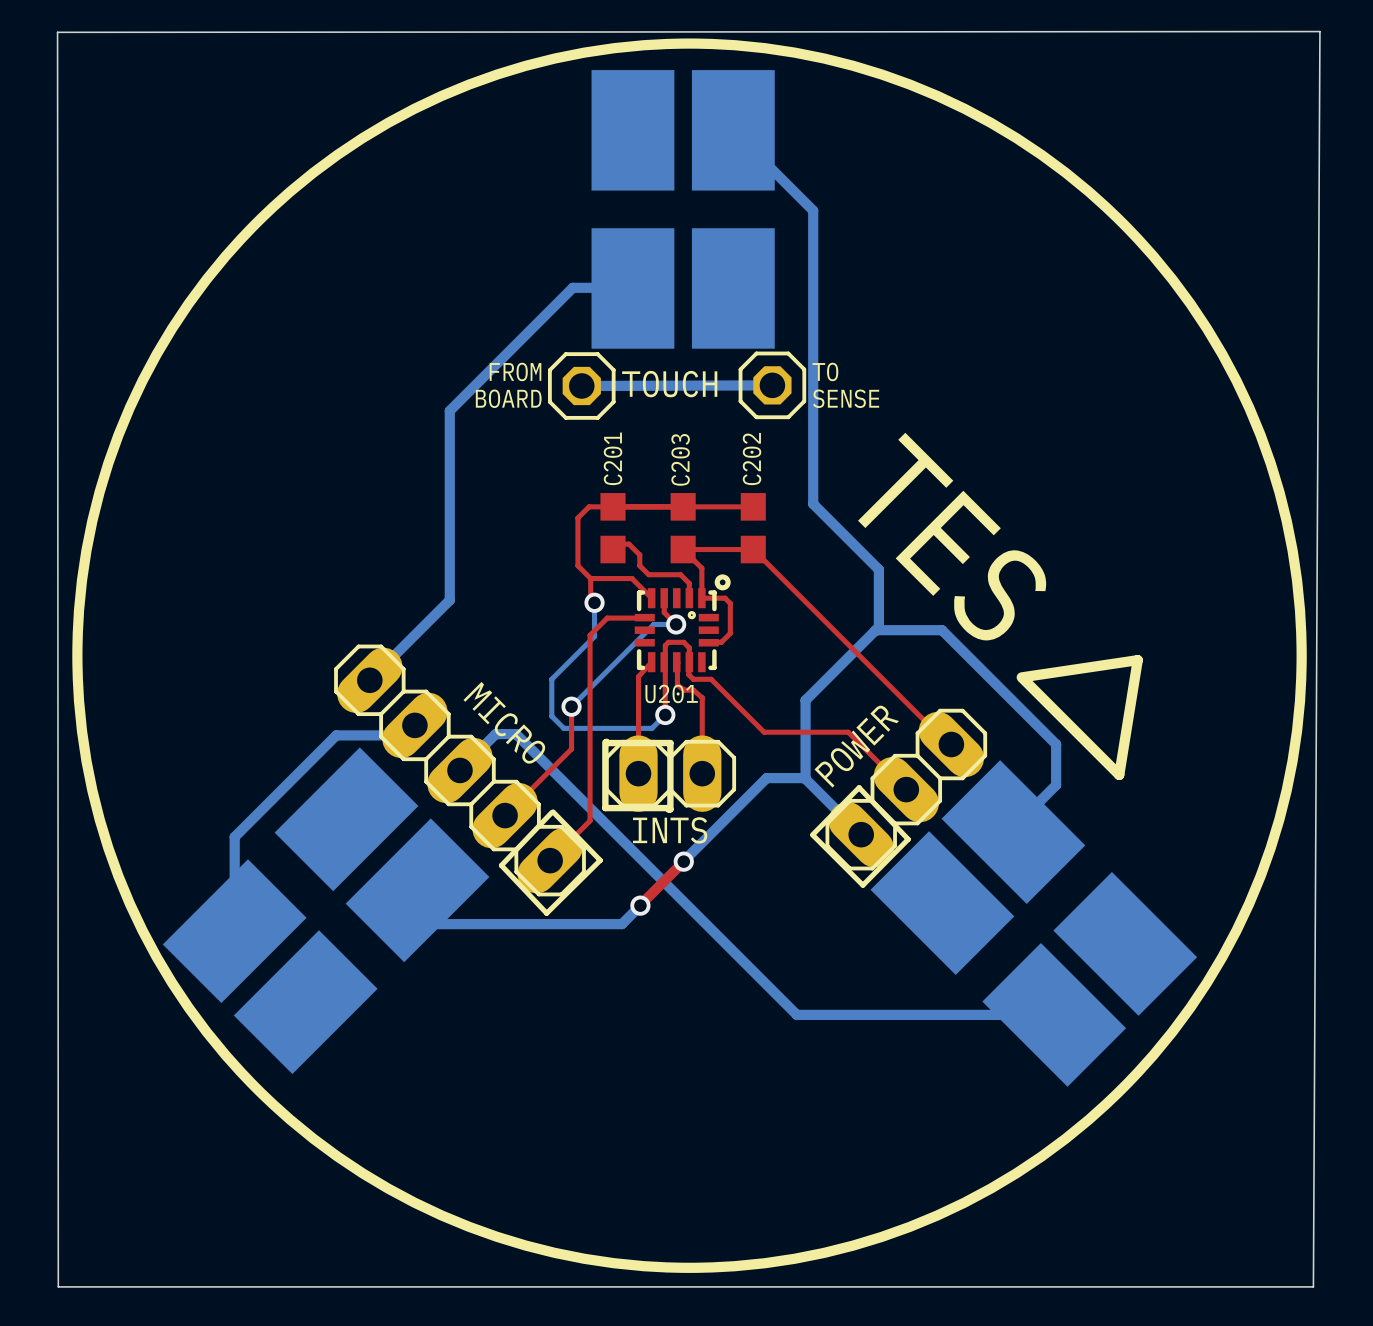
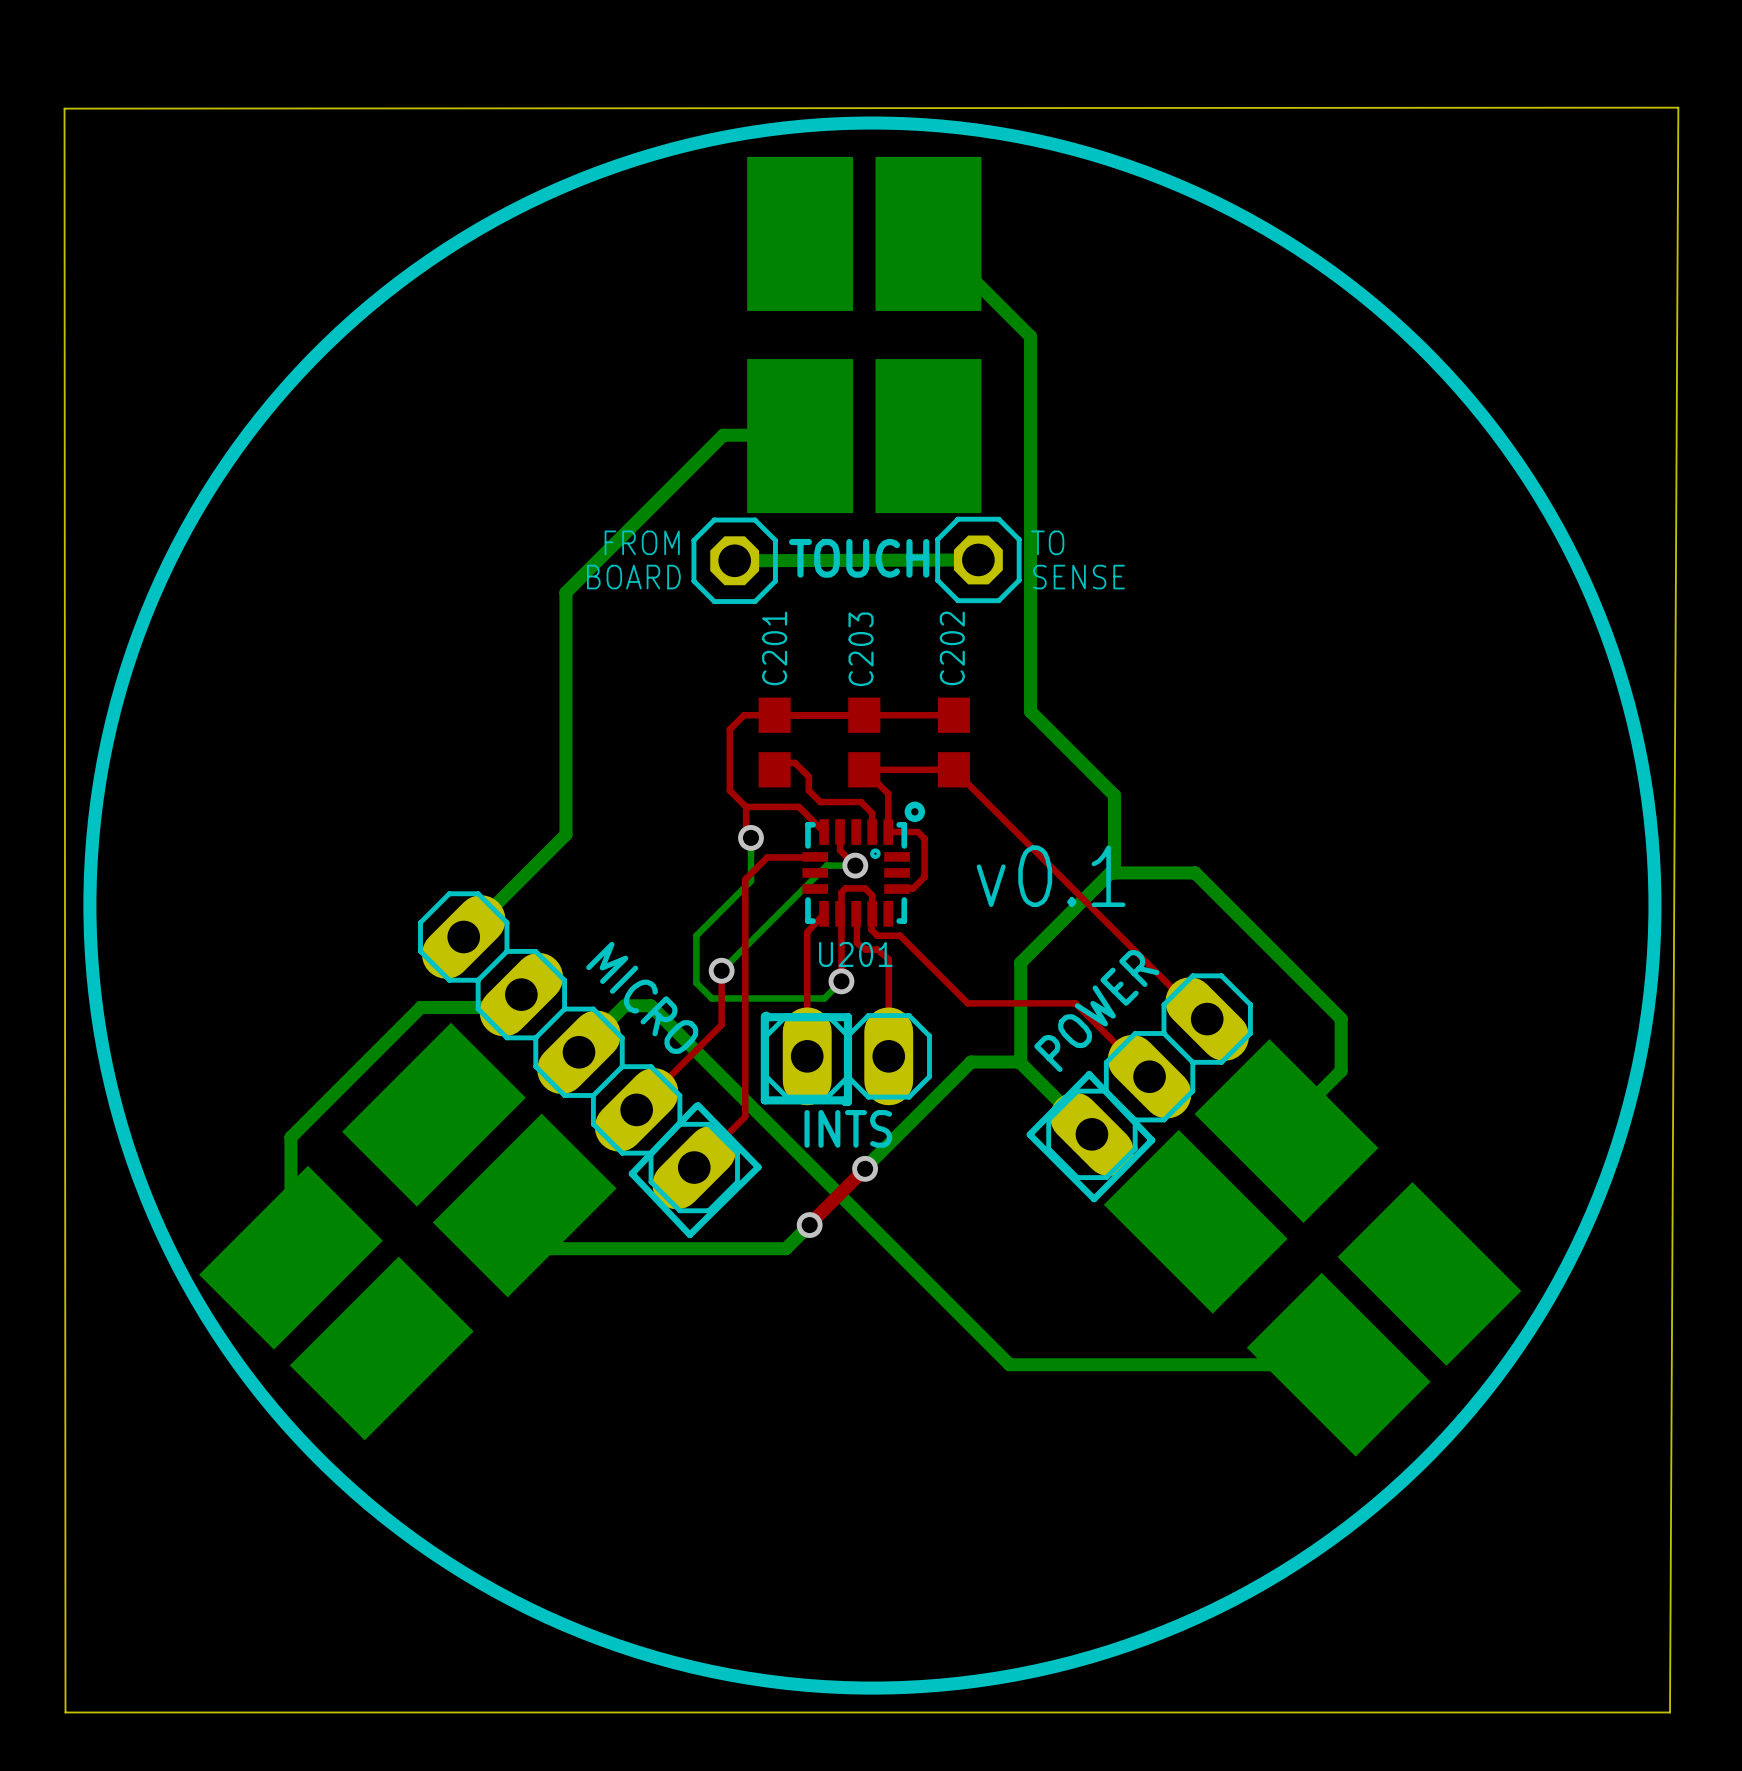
text: TES (952, 536) -> none
text: none -> v0.1 (1051, 876)
line: (1021, 677) (1137, 660) (1119, 774) (1022, 678) -> none

